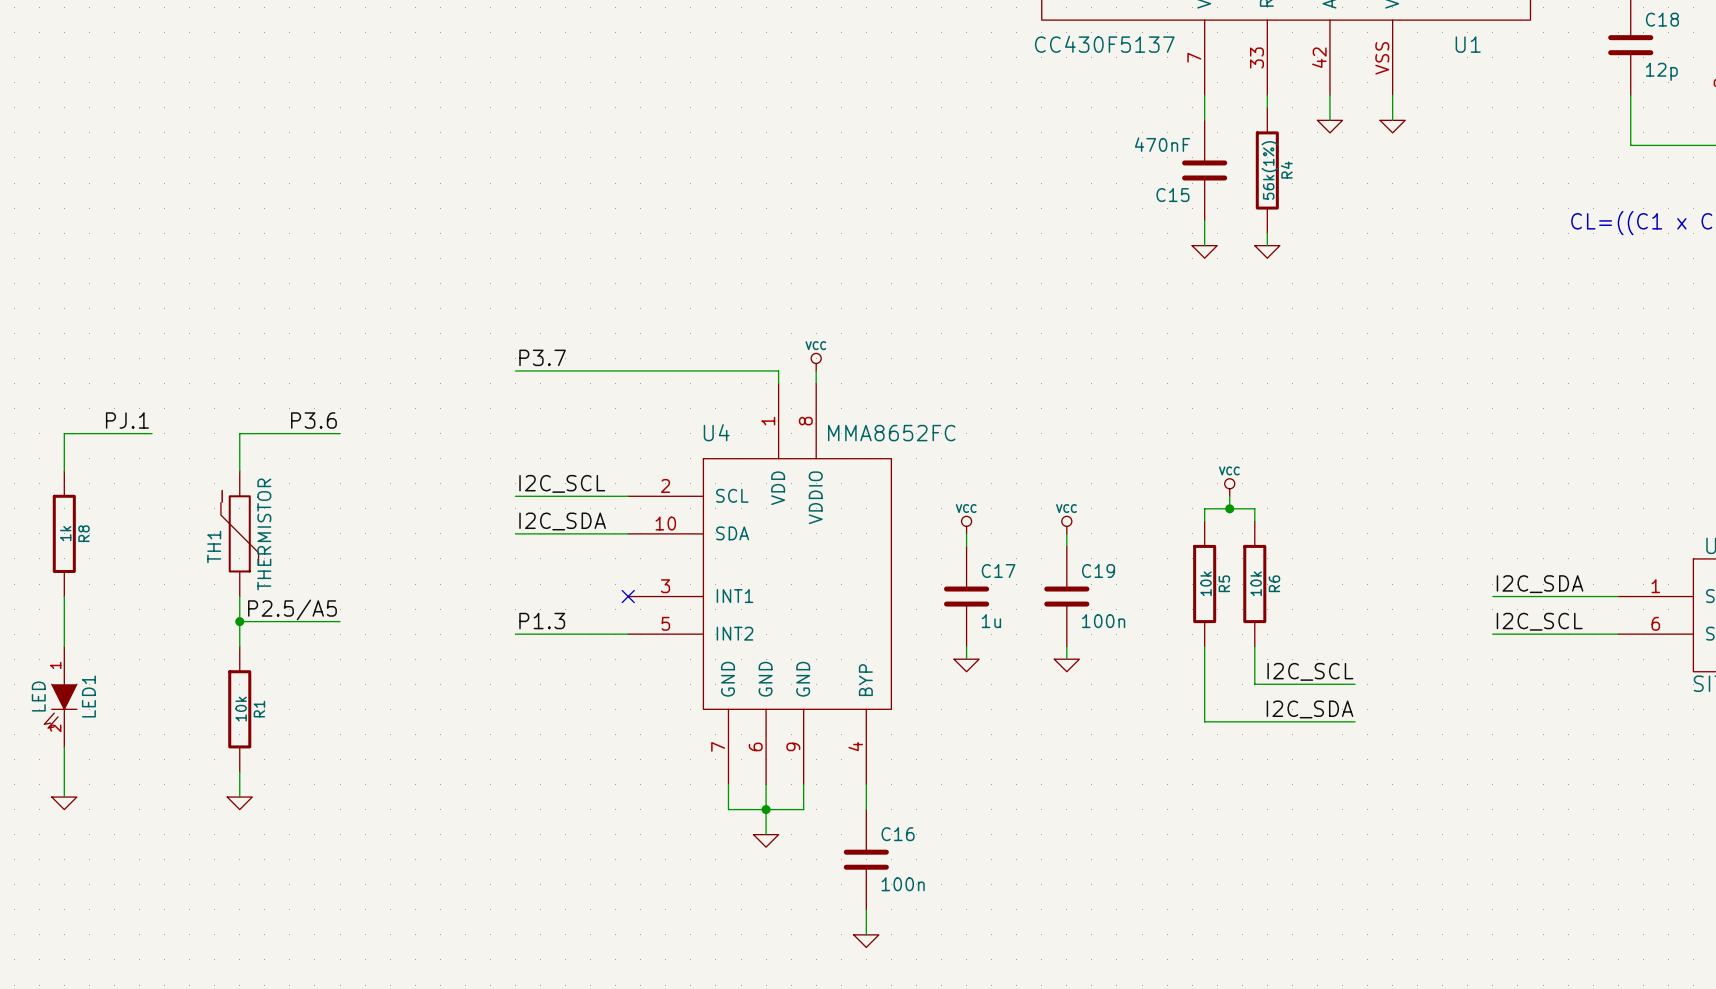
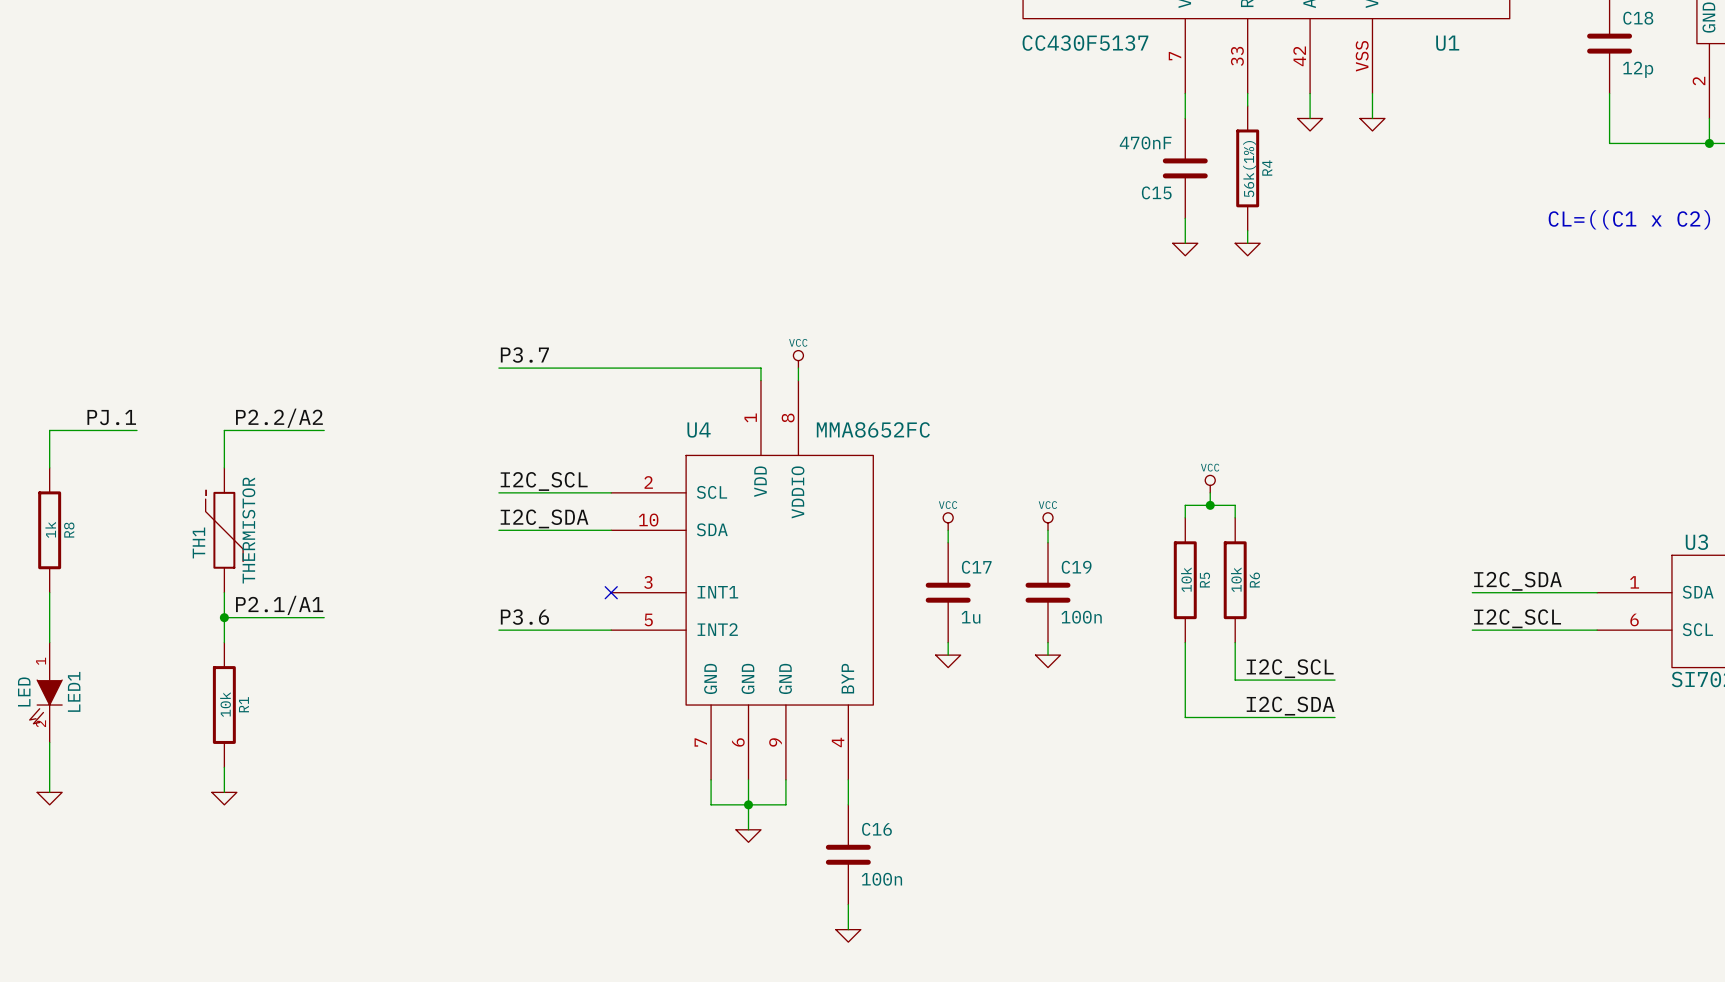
label: P3.6 (313, 420) -> P2.2/A2 (279, 418)
label: P2.5/A5 (292, 609) -> P2.1/A1 (279, 605)
label: P1.3 (542, 621) -> P3.6 (524, 617)

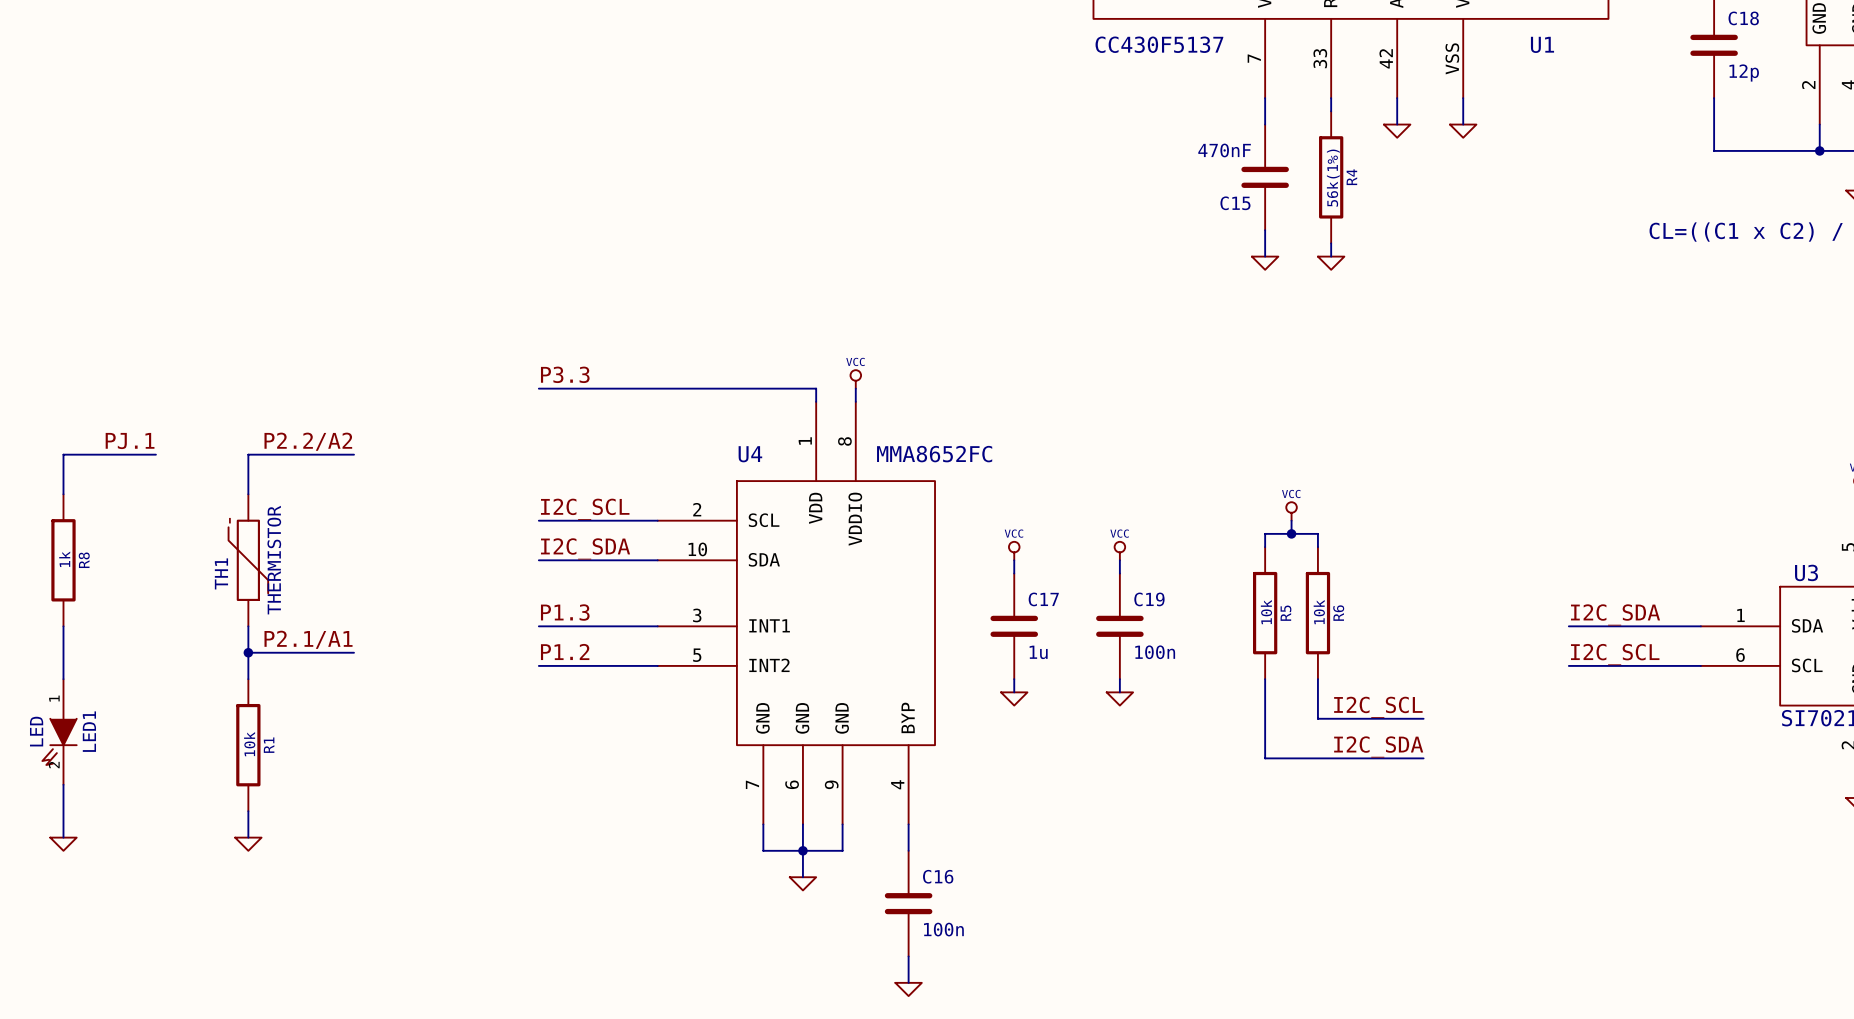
label: P3.7 (524, 355) -> P3.3 (565, 374)
label: none -> P1.3 (565, 612)
wire: none -> (538, 626) (657, 626)
no-connect mark: (611, 592) -> none
label: P3.6 (524, 617) -> P1.2 (565, 651)

